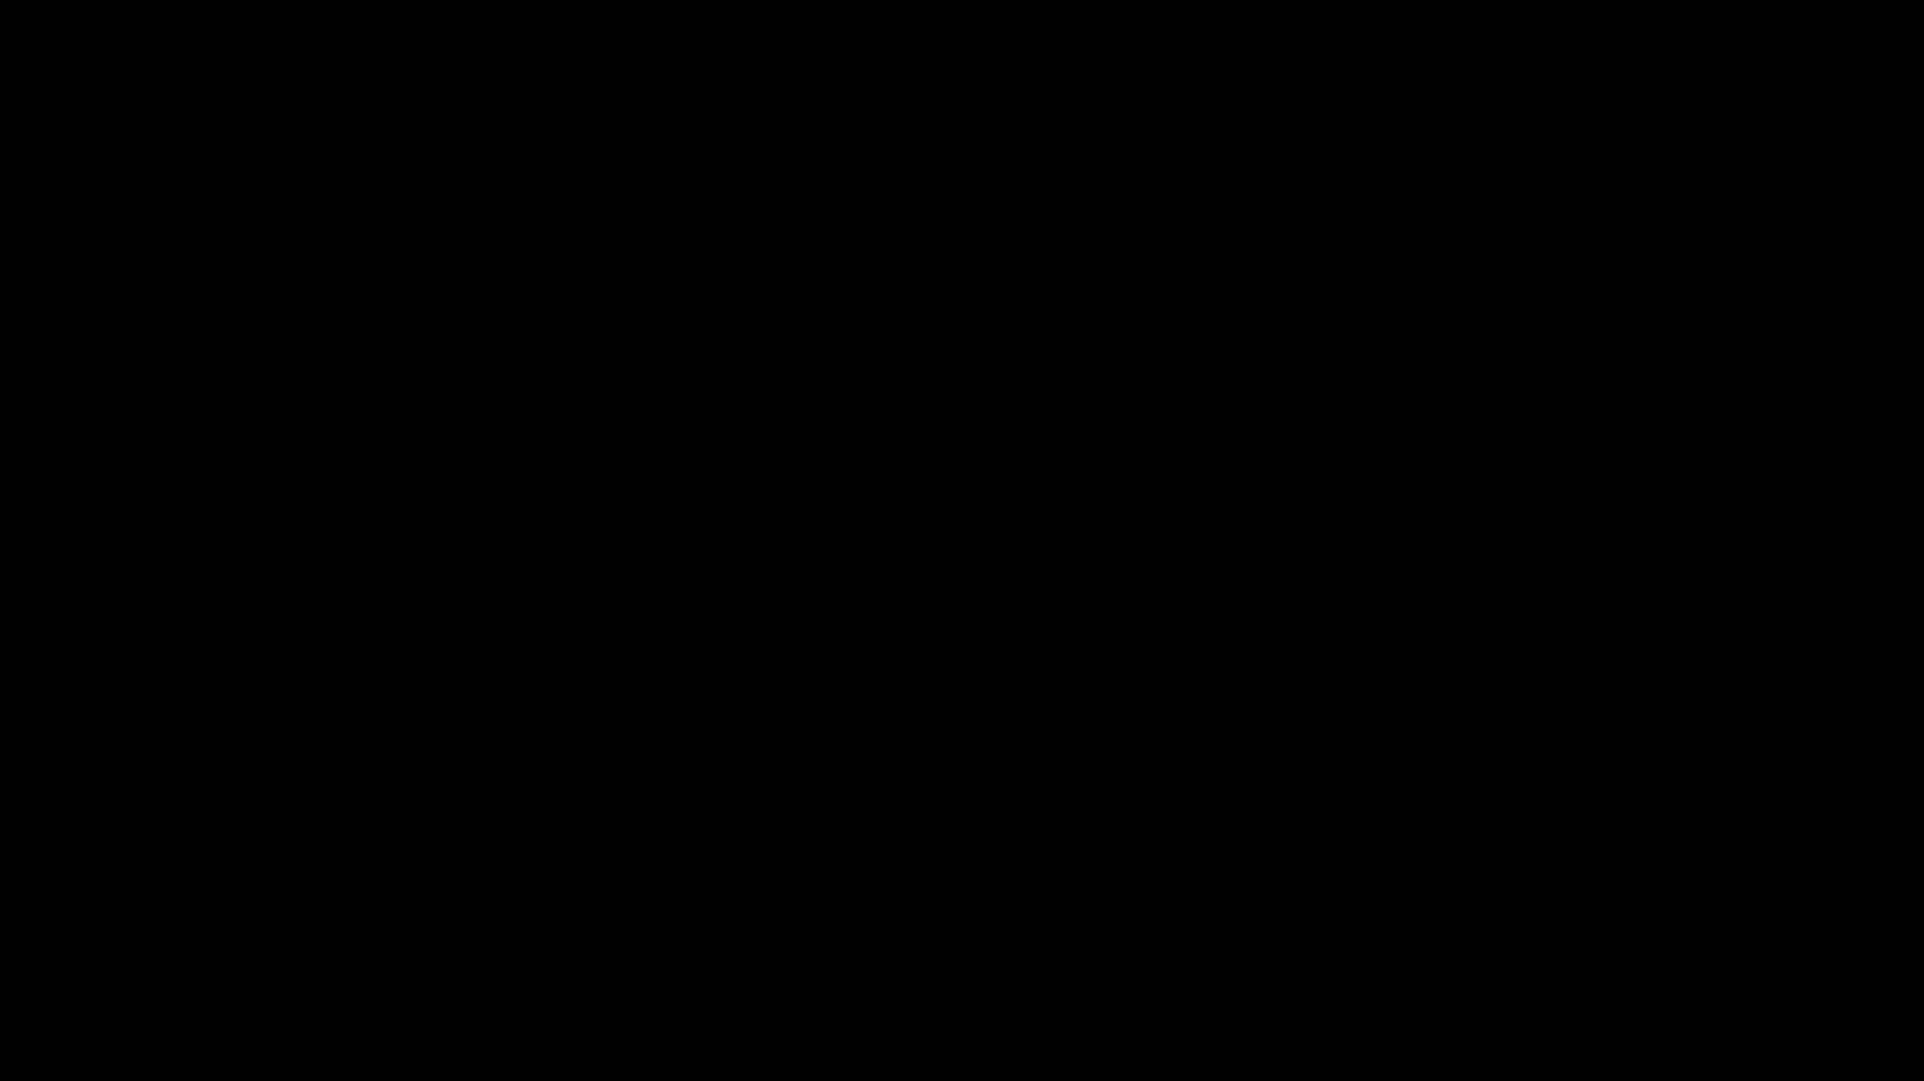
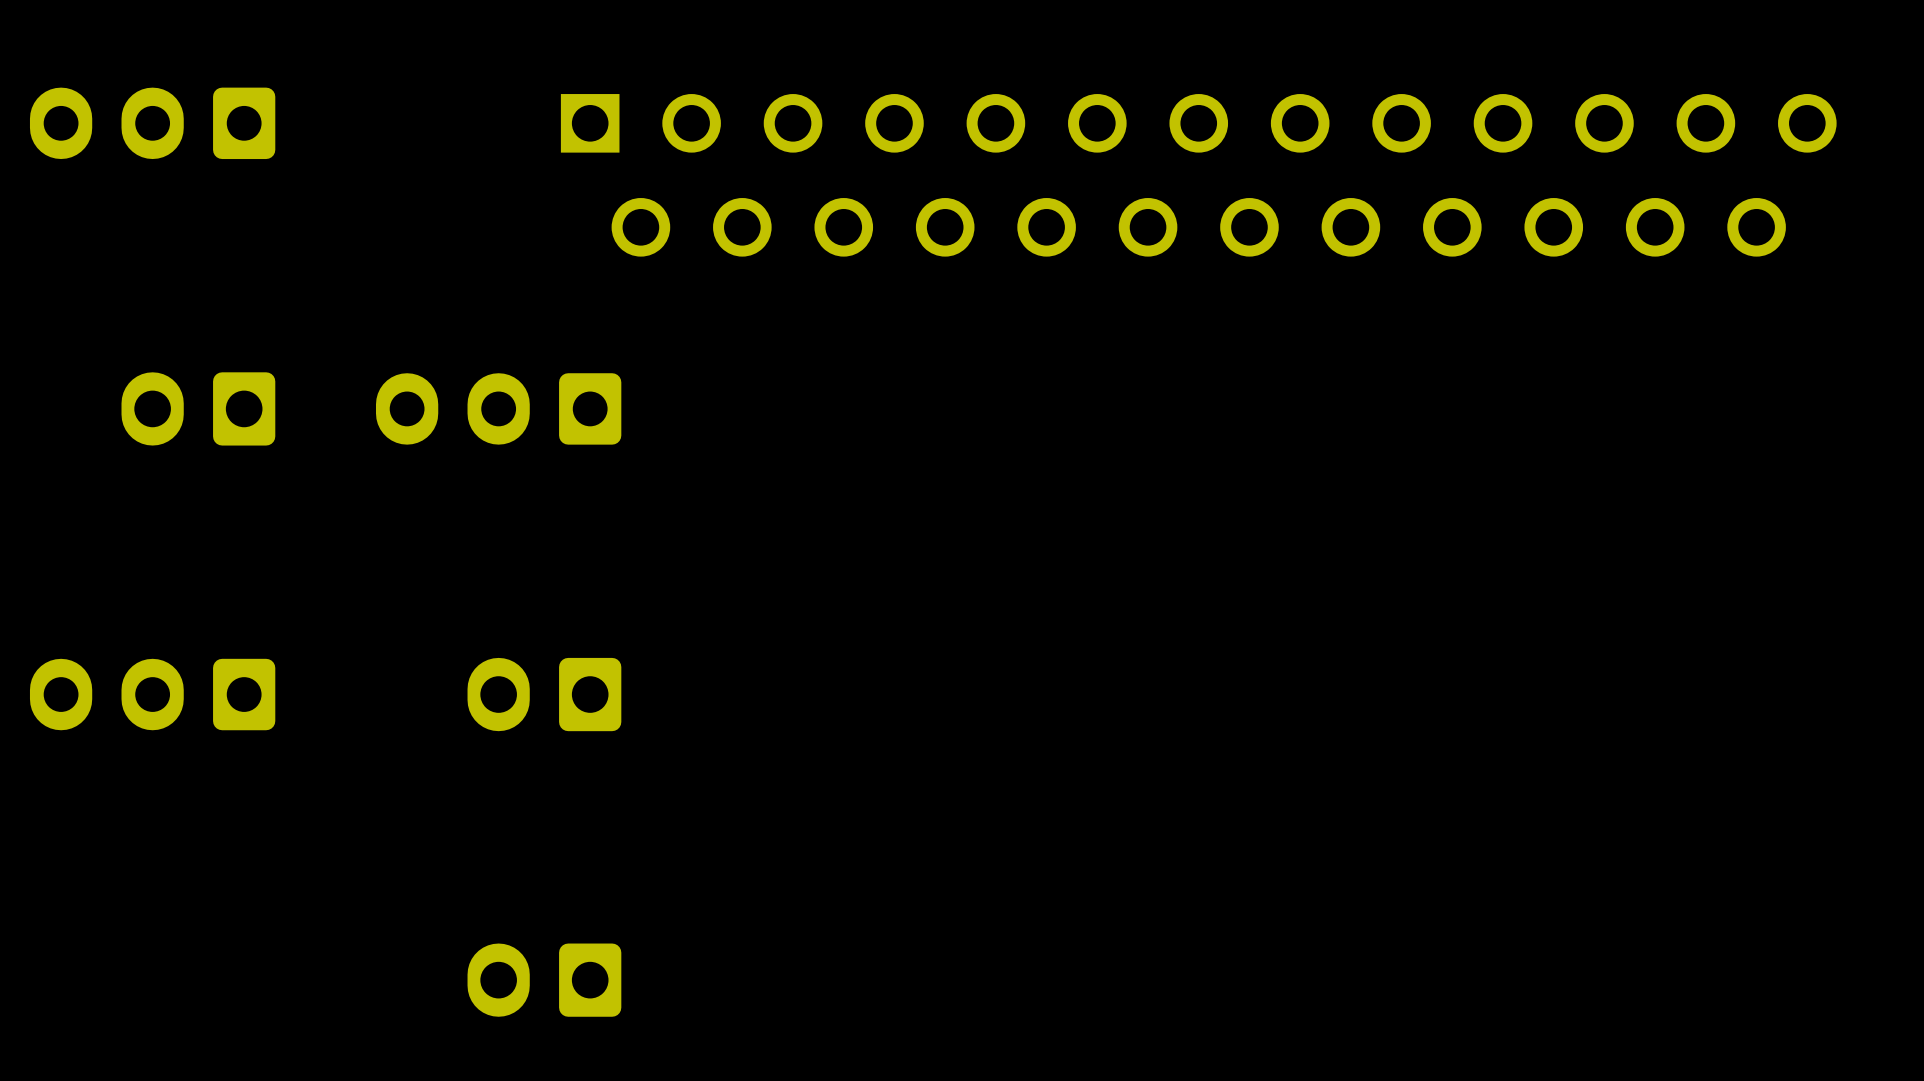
part: none -> (152, 123)
part: none -> (1198, 175)
part: none -> (198, 408)
part: none -> (498, 408)
part: none -> (152, 694)
part: none -> (544, 694)
part: none -> (544, 980)

